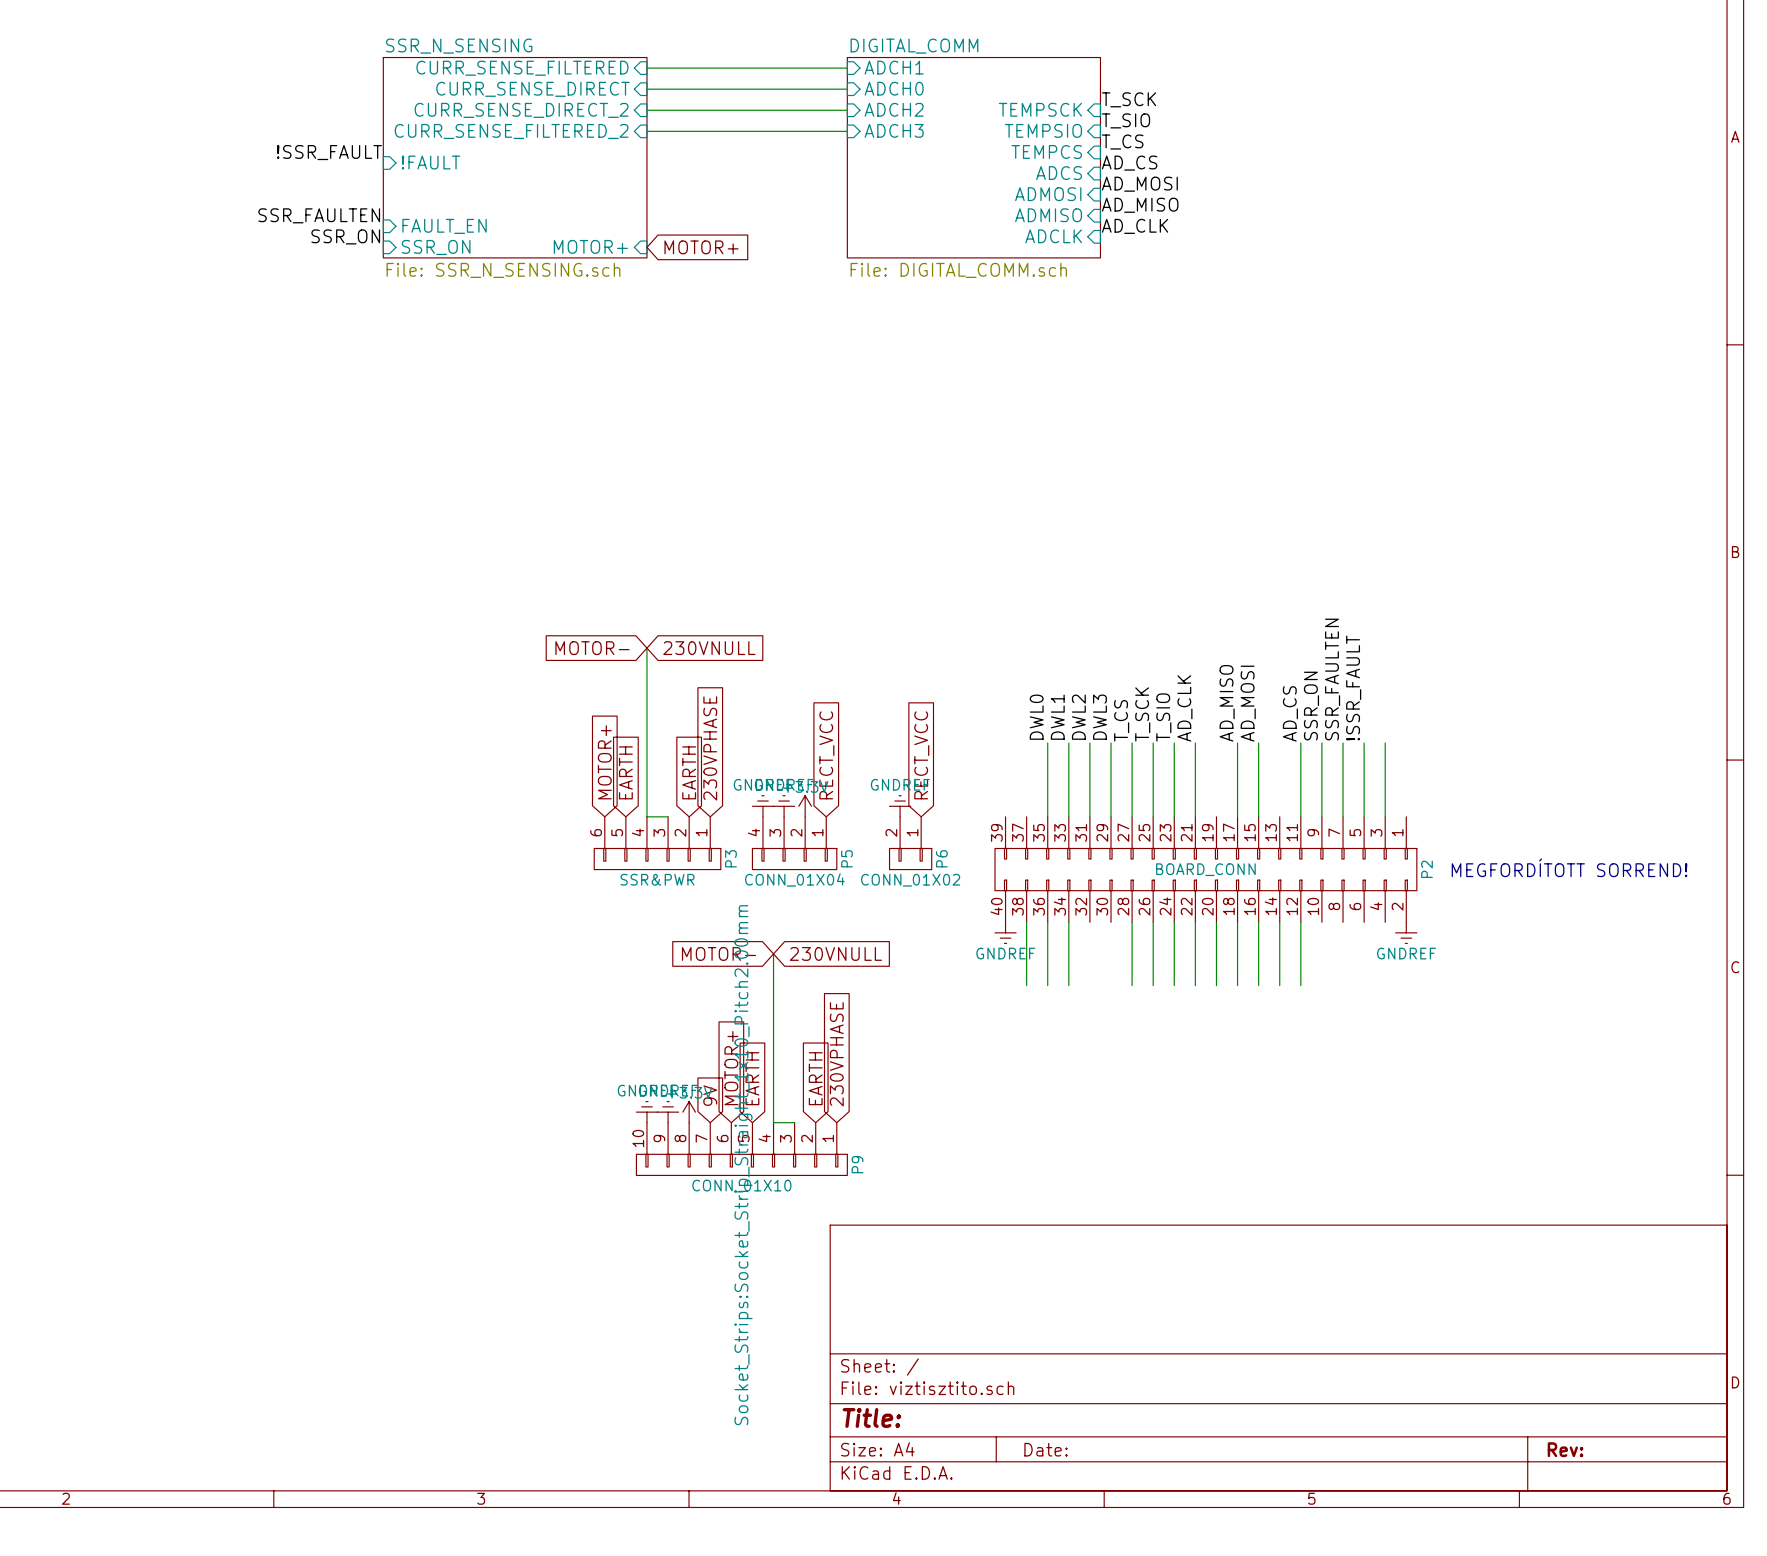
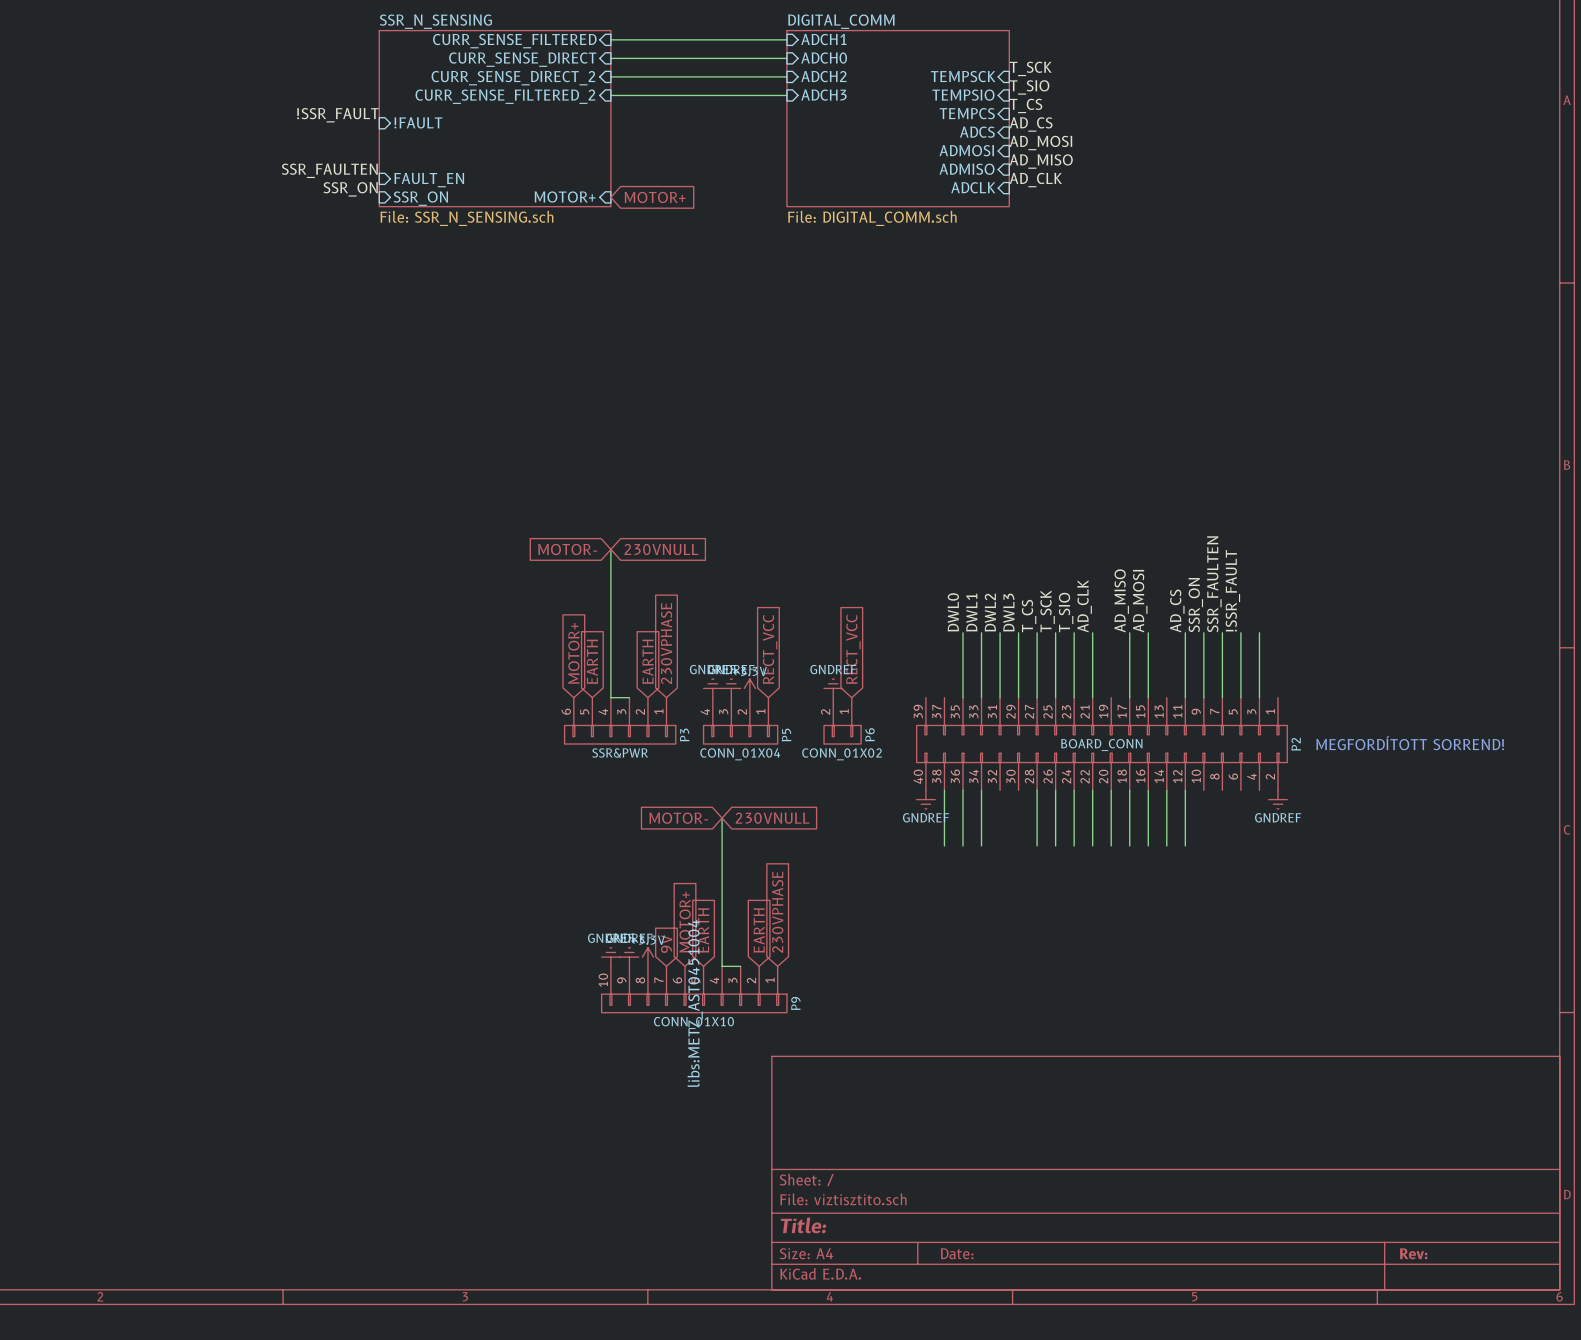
P9 text: Socket_Strips:Socket_Strip_Straight_1x10_Pitch2.00mm (743, 1165) -> libs:METZ_AST0451004 (695, 1003)

